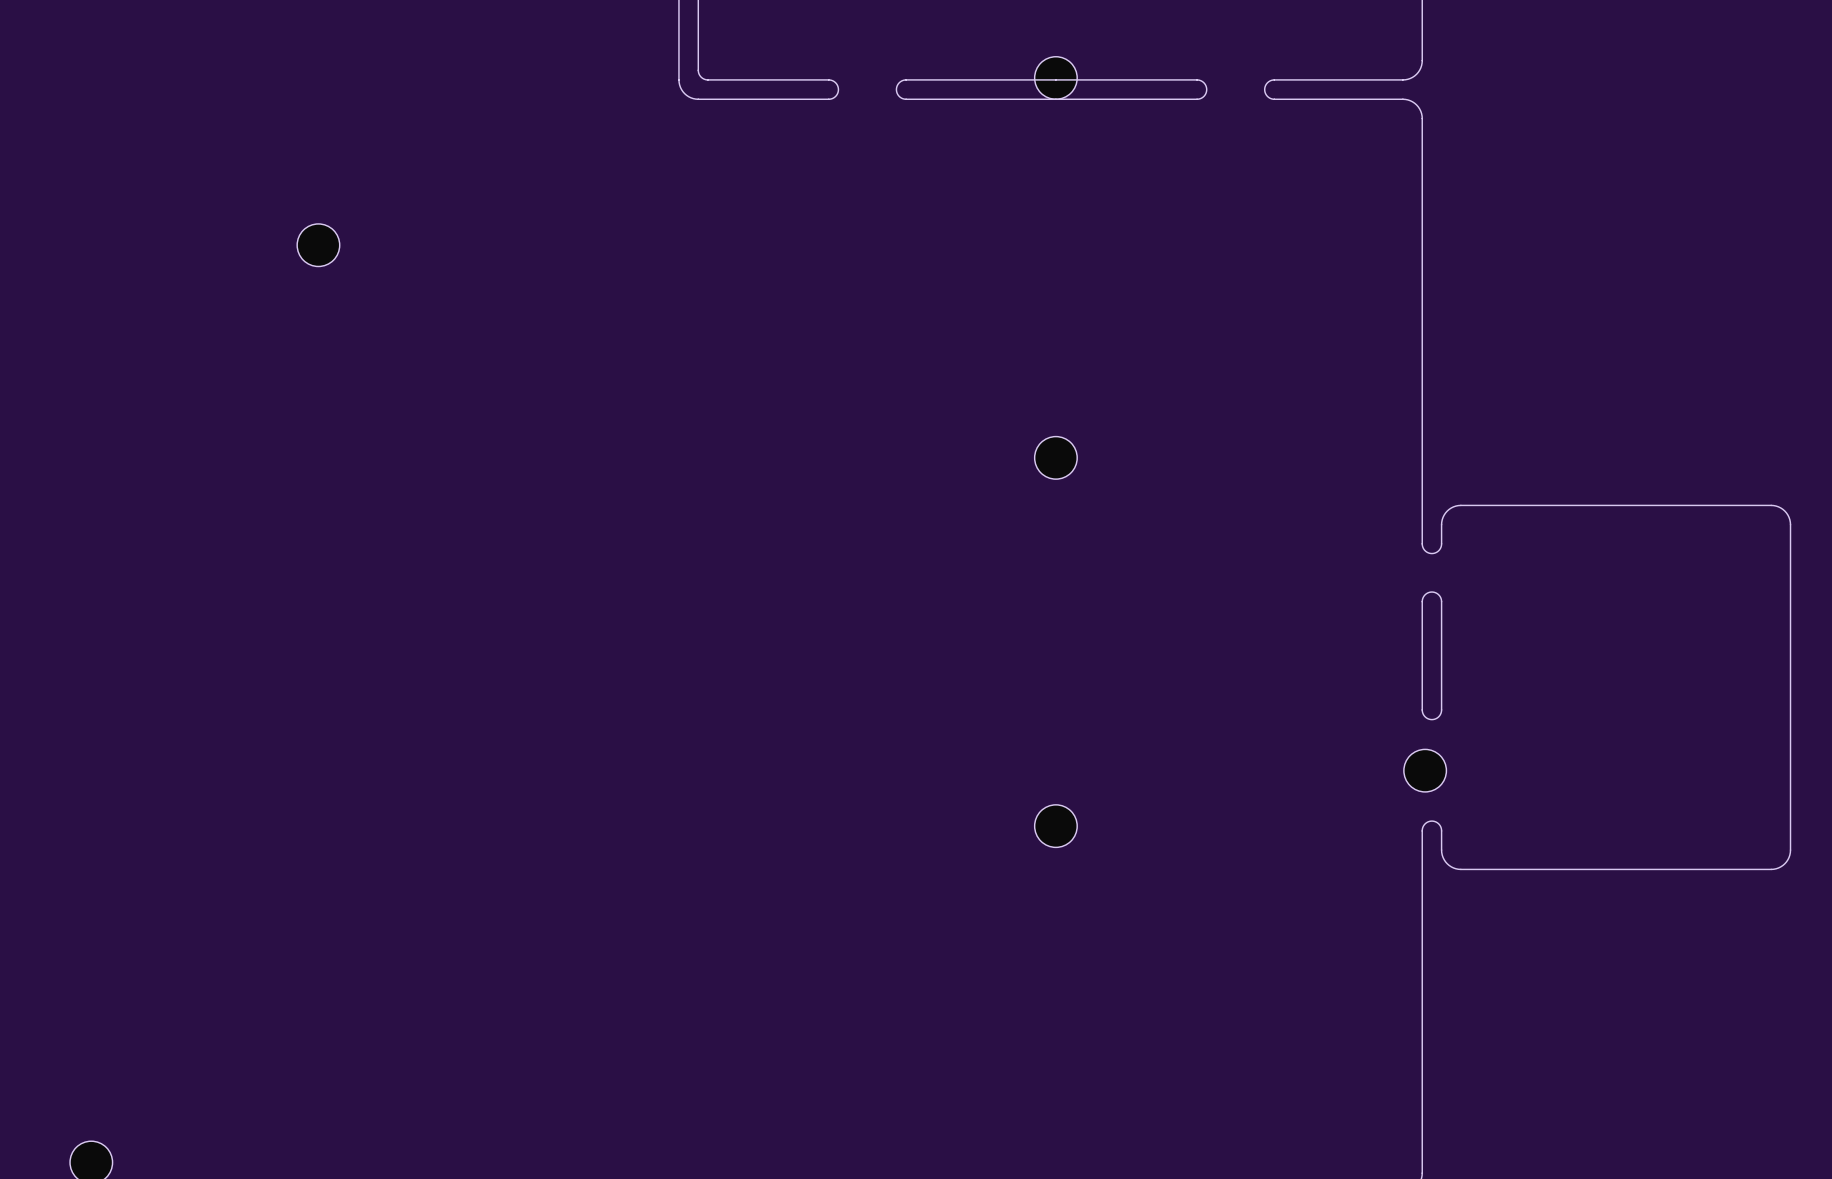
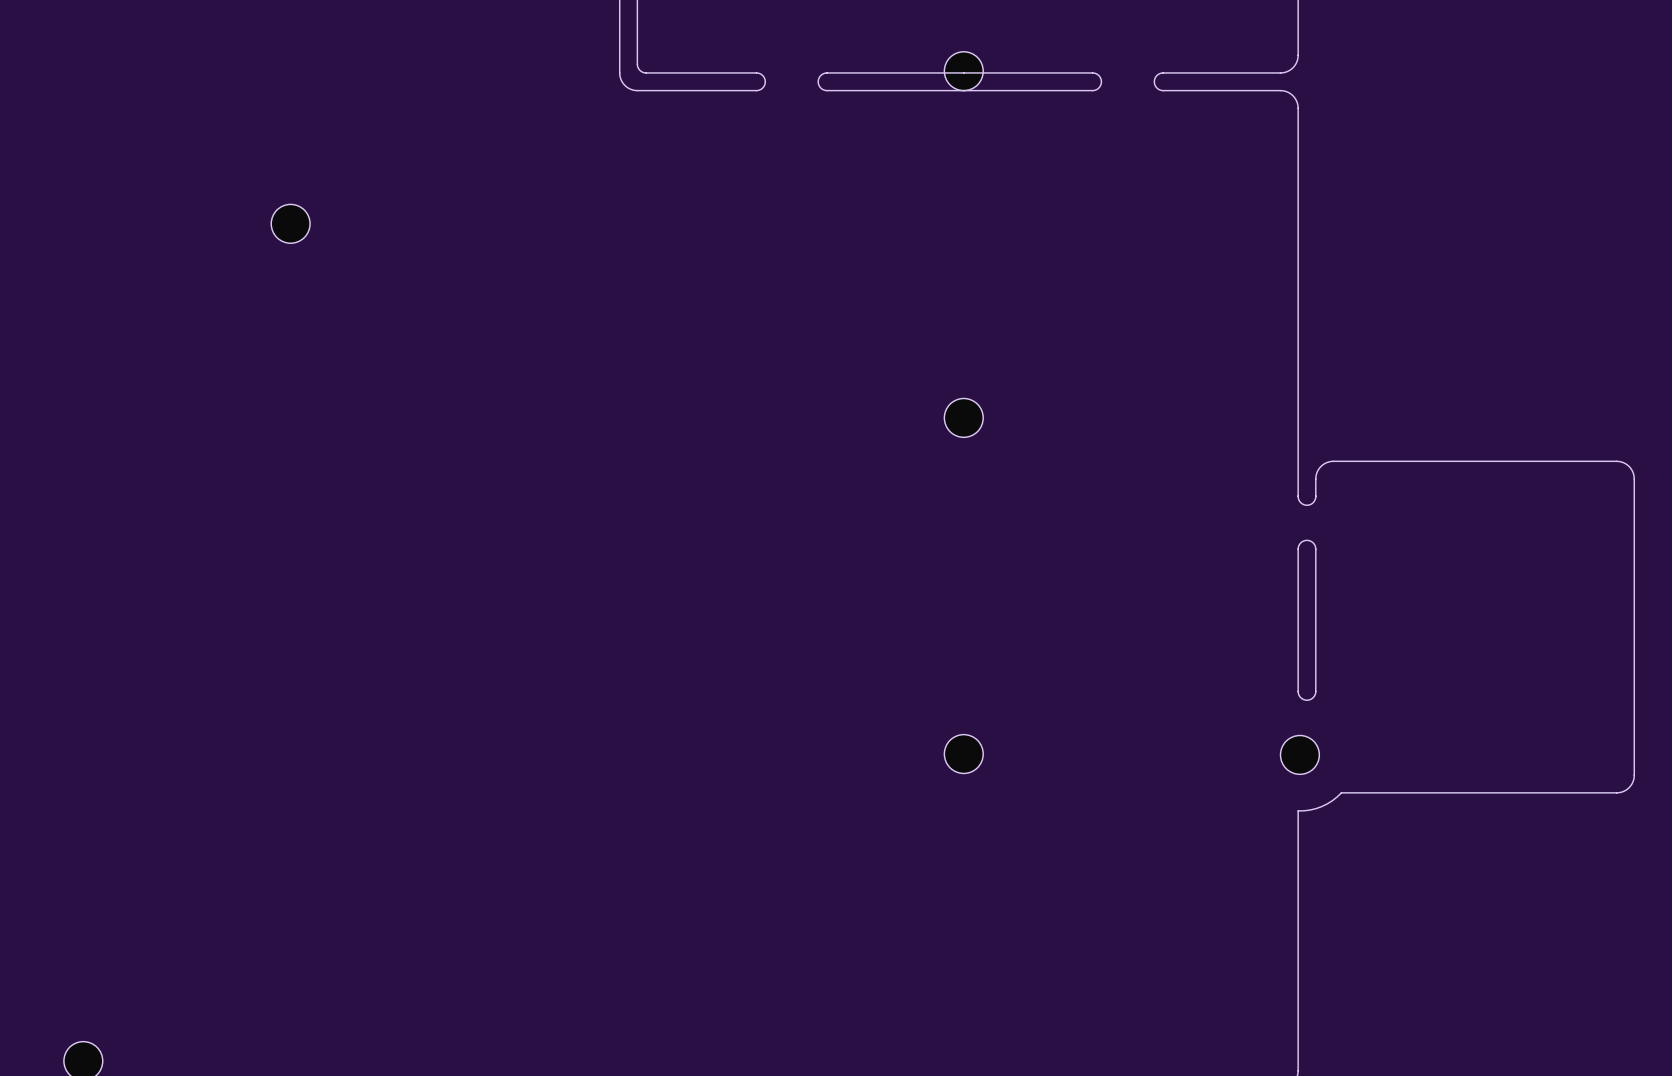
board edge: (1441, 709) (1438, 716) (1431, 719) (1425, 716) (1422, 709) -> (1315, 647) (1315, 692) (1312, 698) (1306, 700) (1301, 698) (1298, 692) (1298, 647)
part position: (1425, 770) -> (1299, 754)
board edge: (1790, 849) (1789, 857) (1784, 863) (1771, 869) (1458, 869) (1449, 865) (1444, 859) (1441, 852) (1441, 827) (1437, 822) (1430, 821) (1424, 824) (1422, 829) (1422, 888) -> (1634, 775) (1629, 787) (1618, 792) (1341, 792) (1321, 806) (1298, 810)

